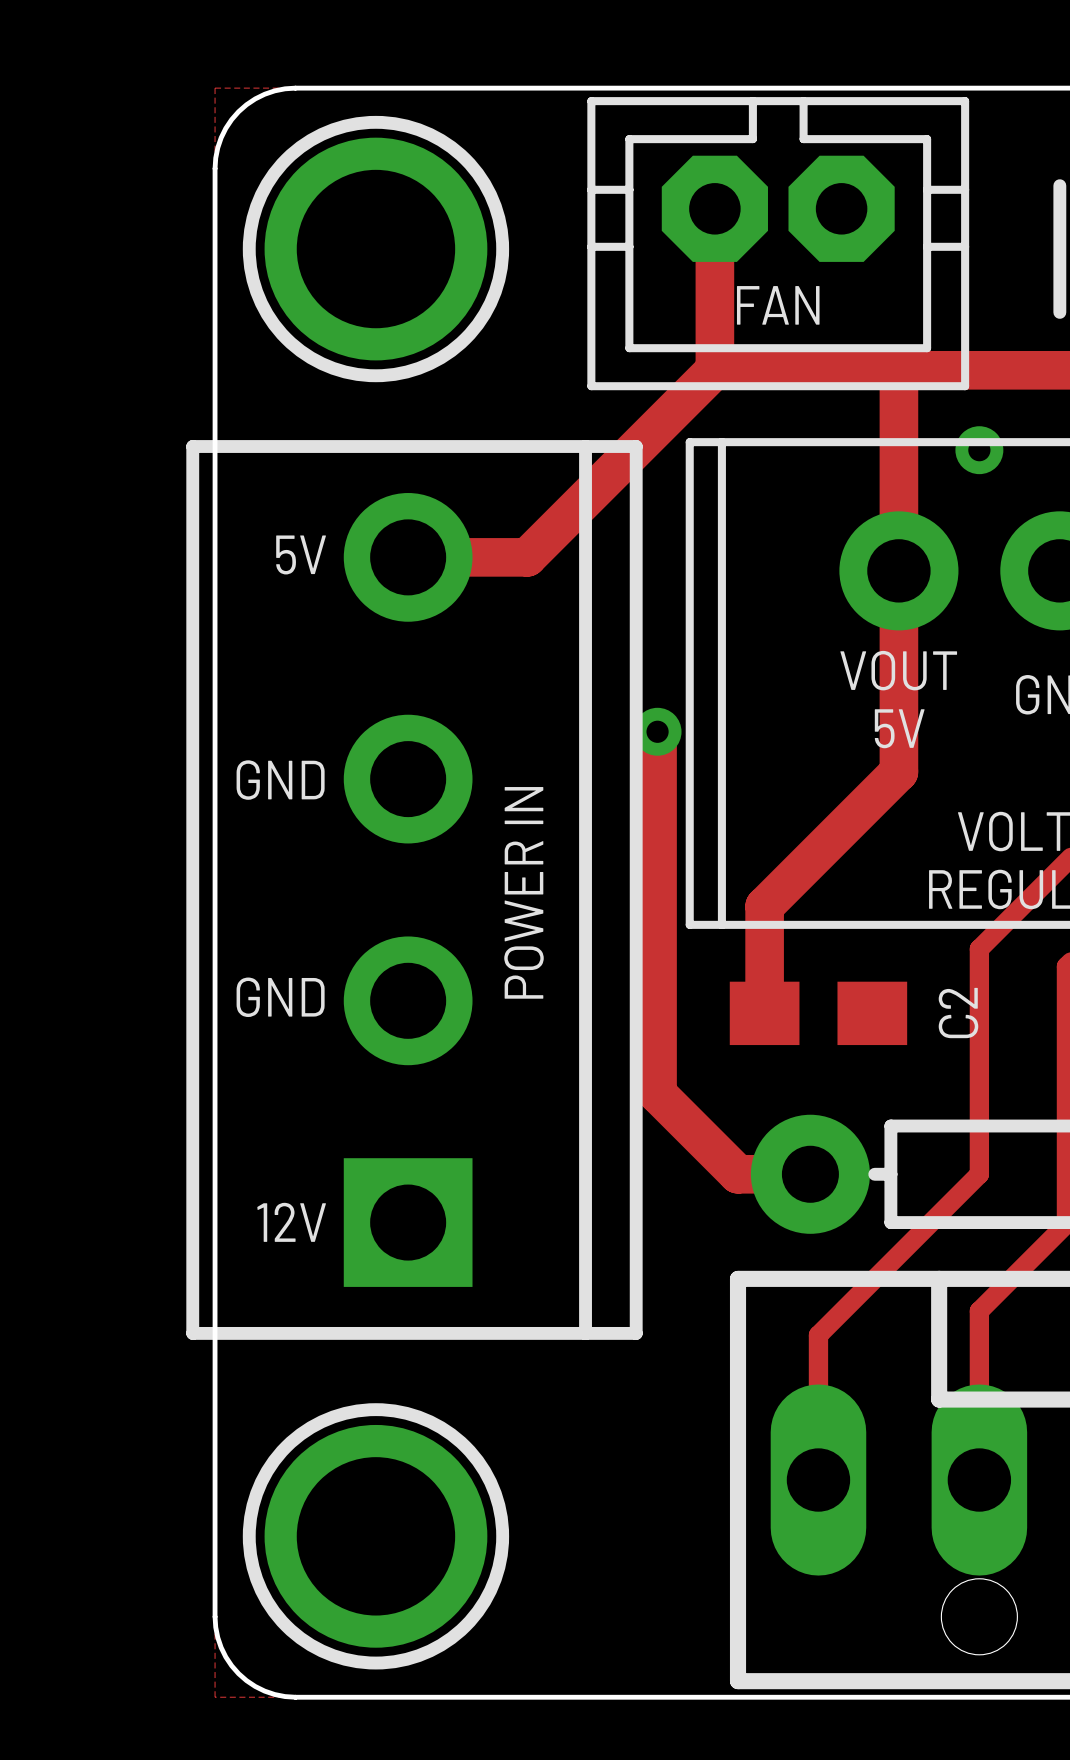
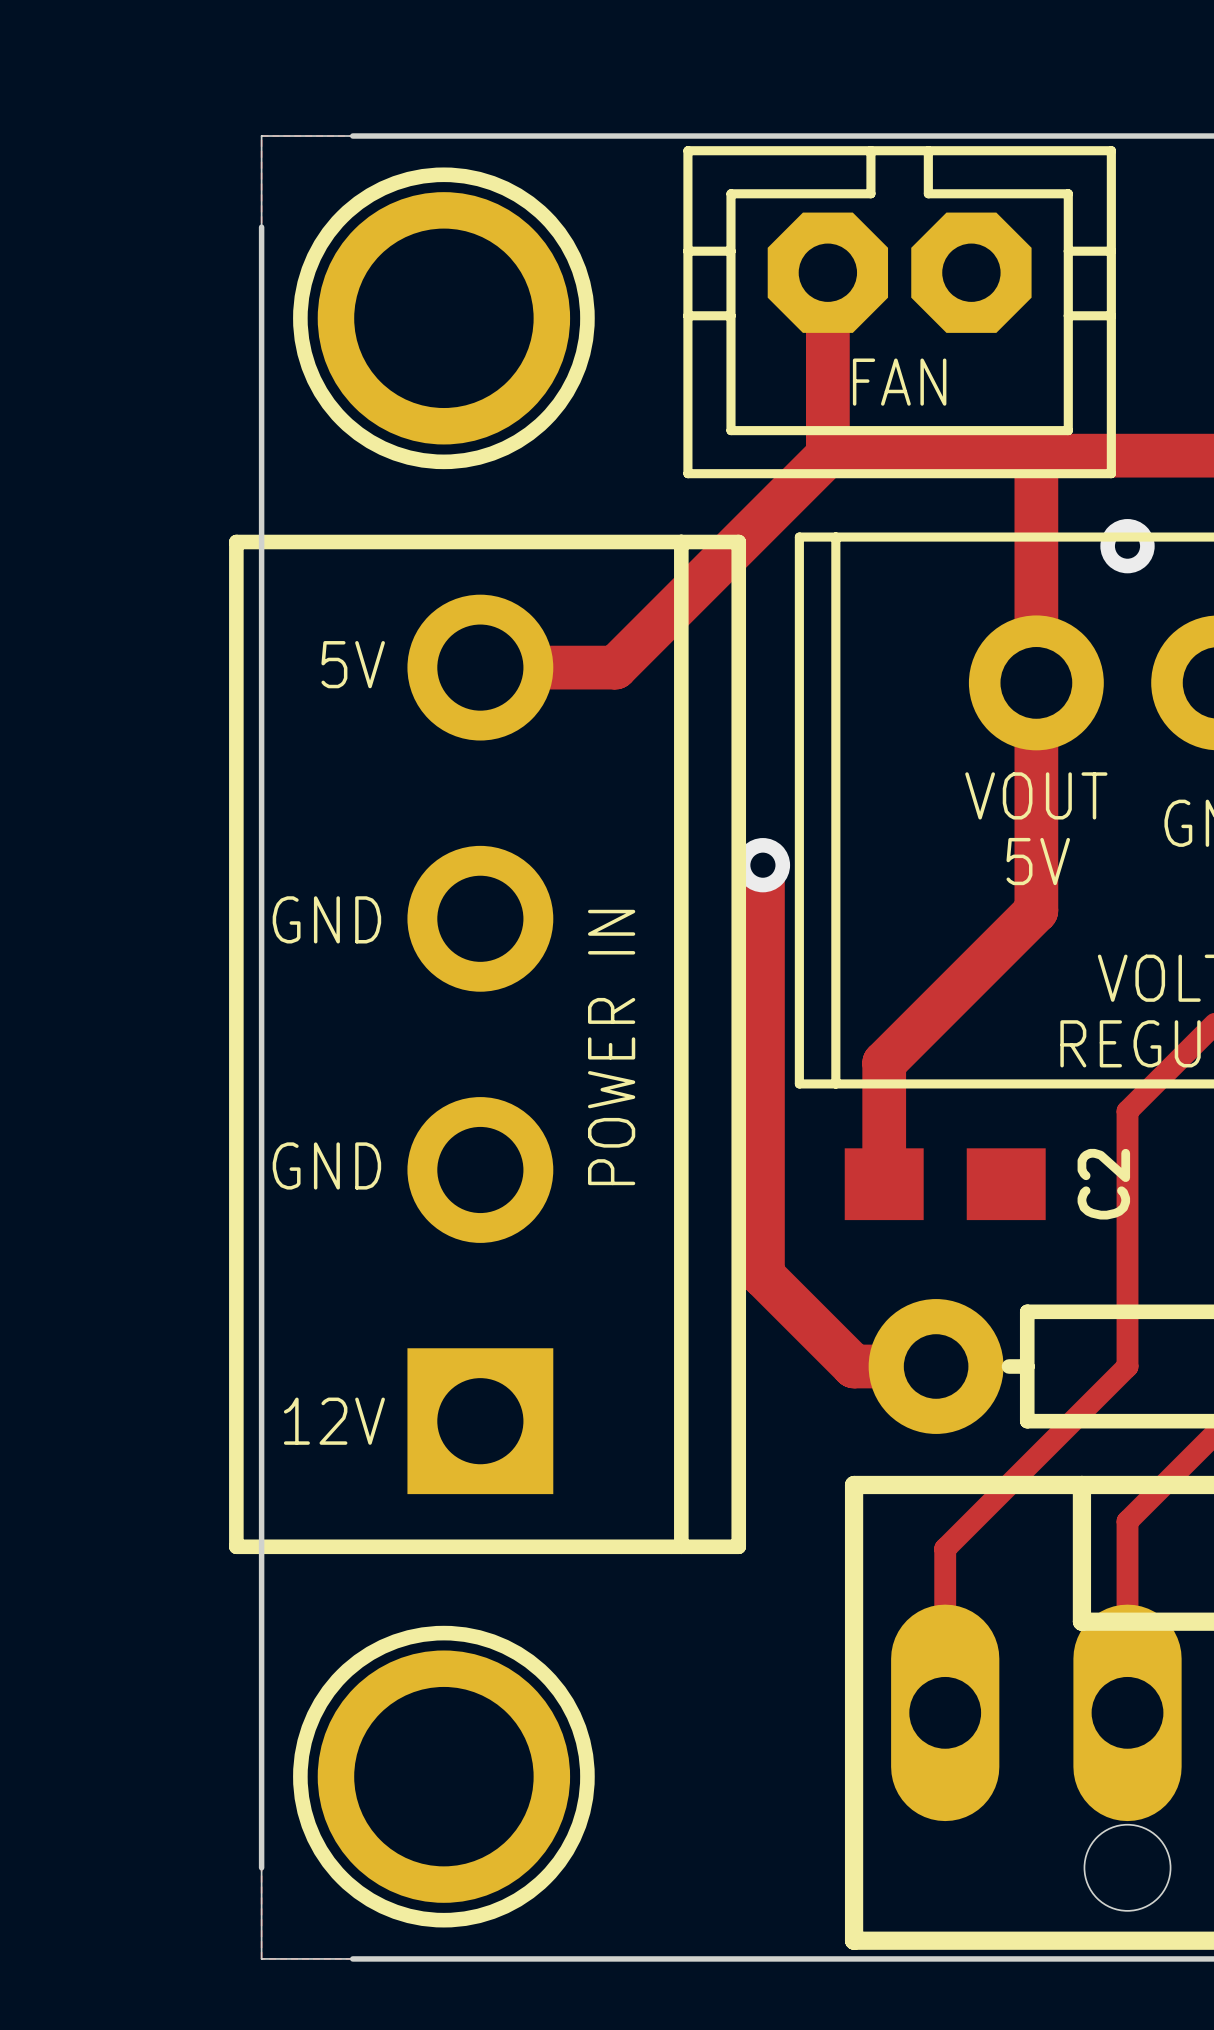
board edge: (295, 88) (264, 94) (238, 111) (221, 137) (215, 168) -> (352, 136) (261, 136) (261, 227)
board edge: (215, 1616) (221, 1647) (238, 1673) (264, 1691) (295, 1697) -> (261, 1867) (261, 1958) (352, 1958)

